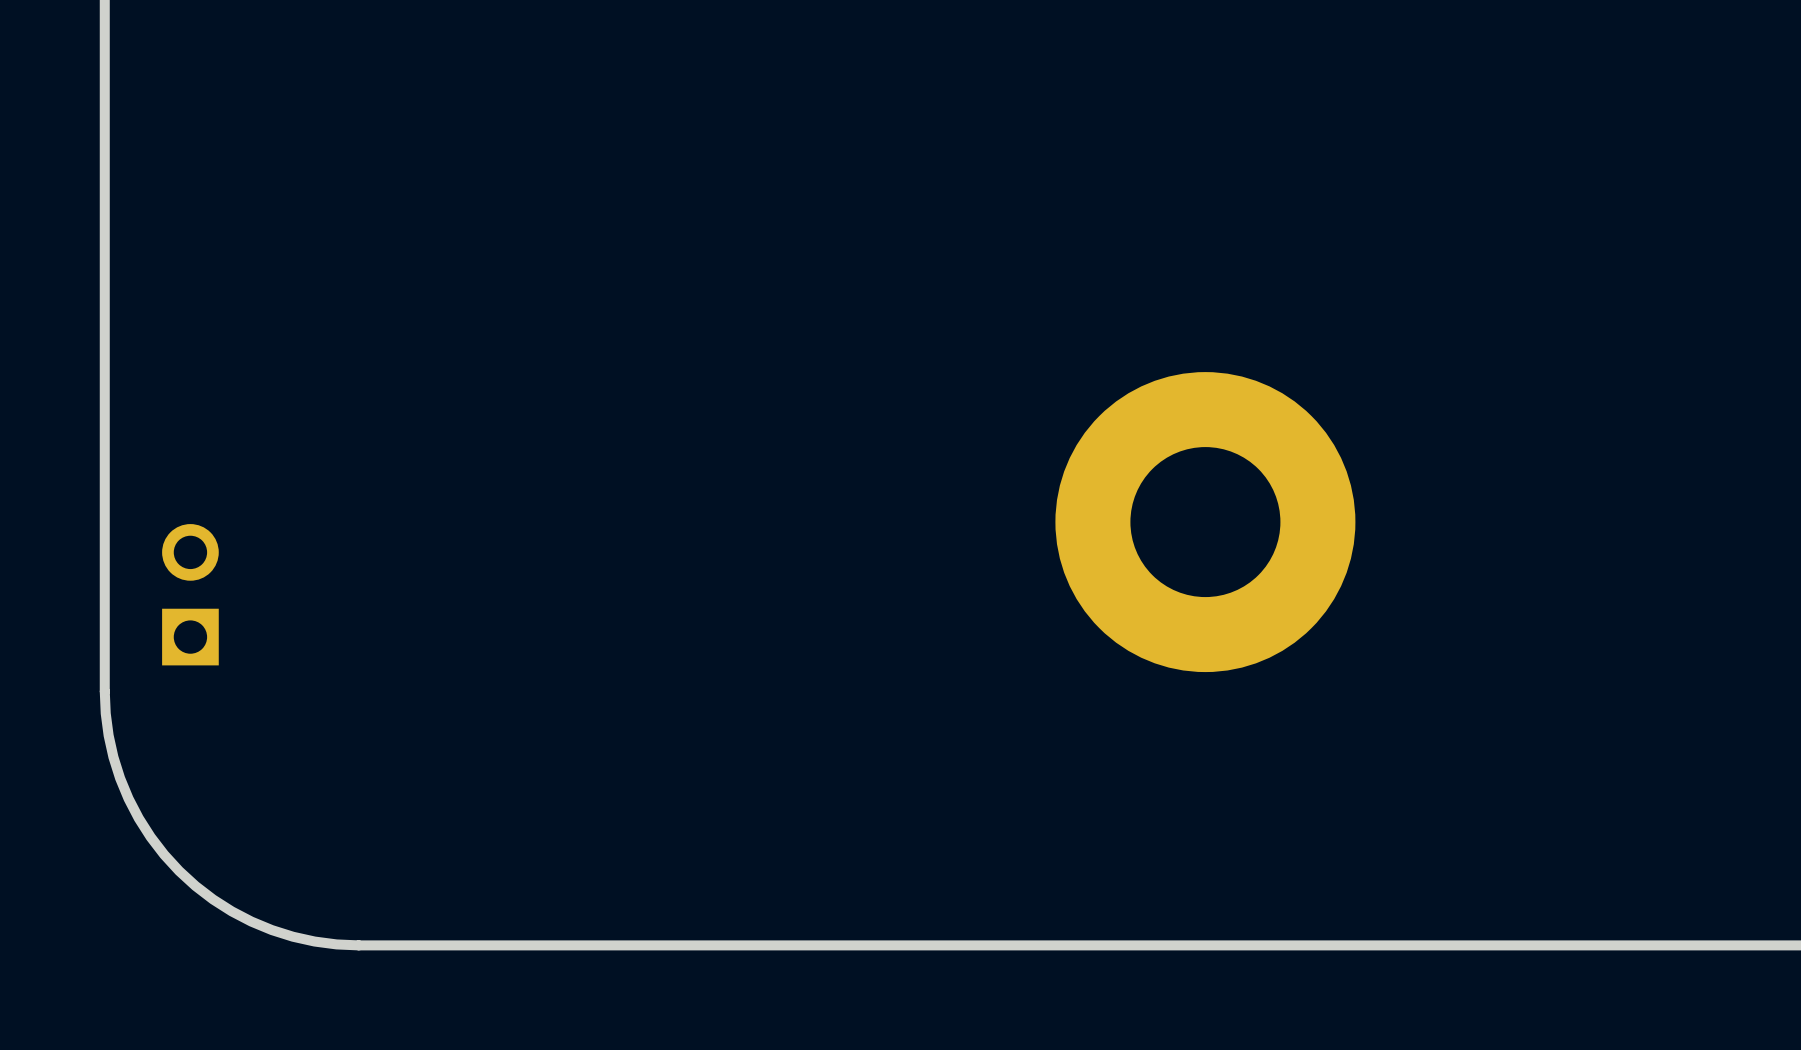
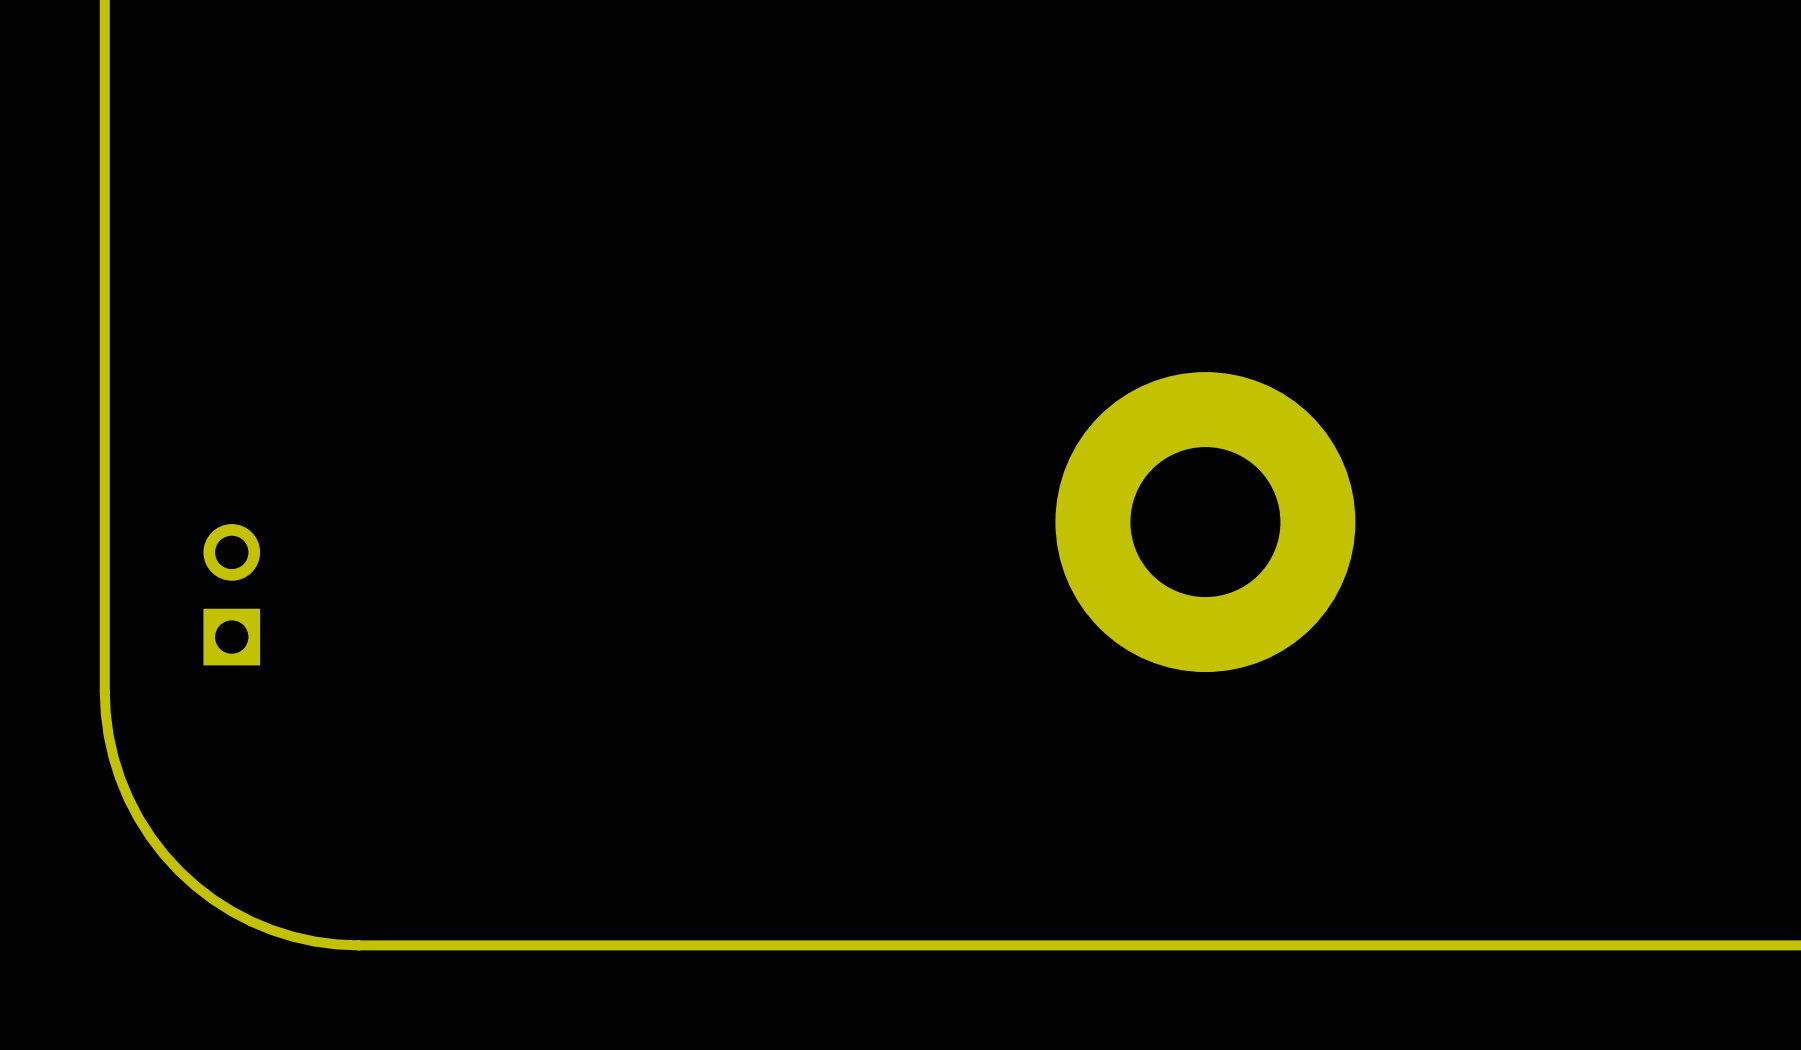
part position: (190, 594) -> (231, 594)

